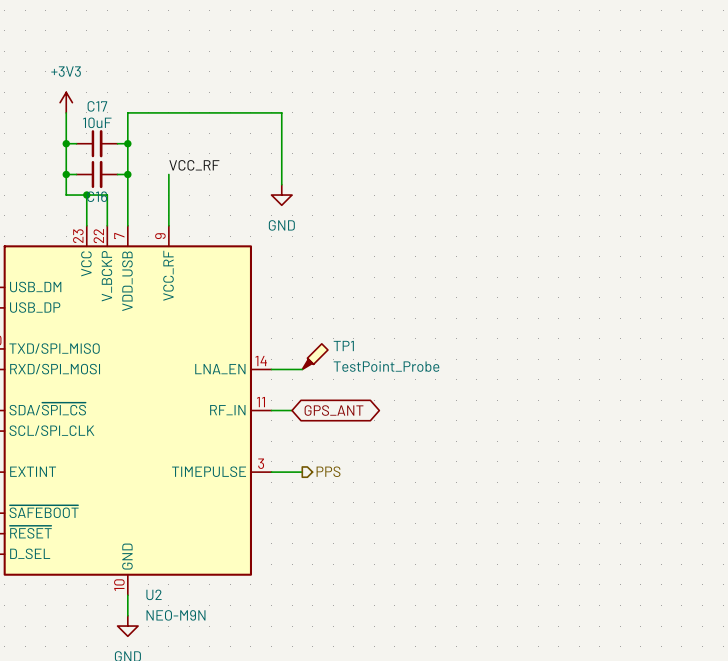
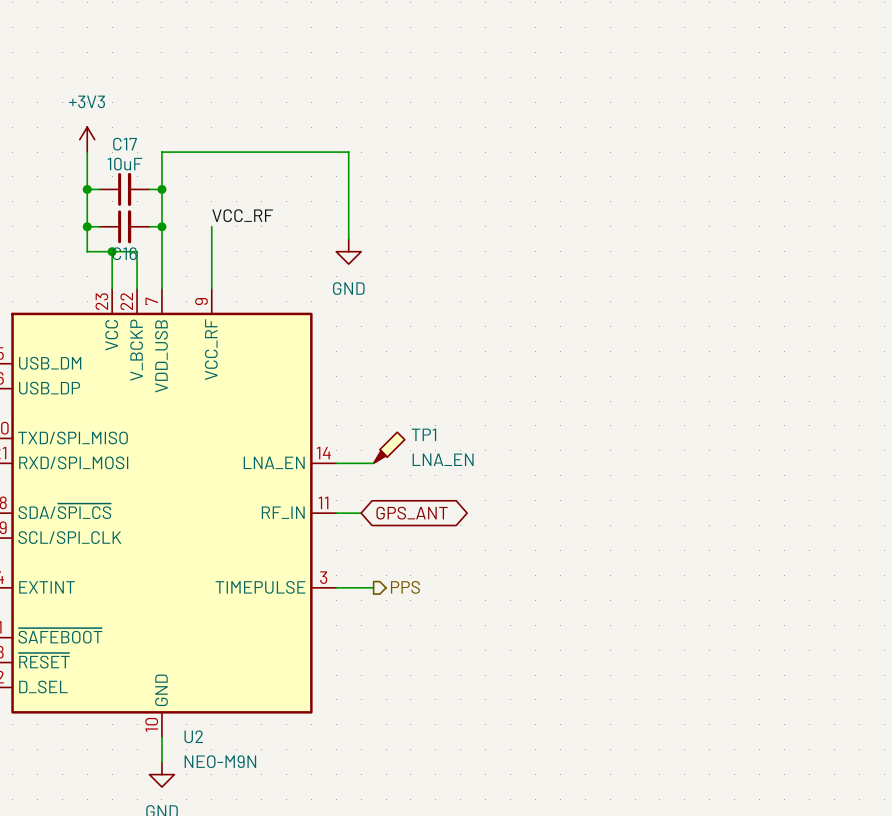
TP1 value: TestPoint_Probe (386, 366) -> LNA_EN (443, 459)

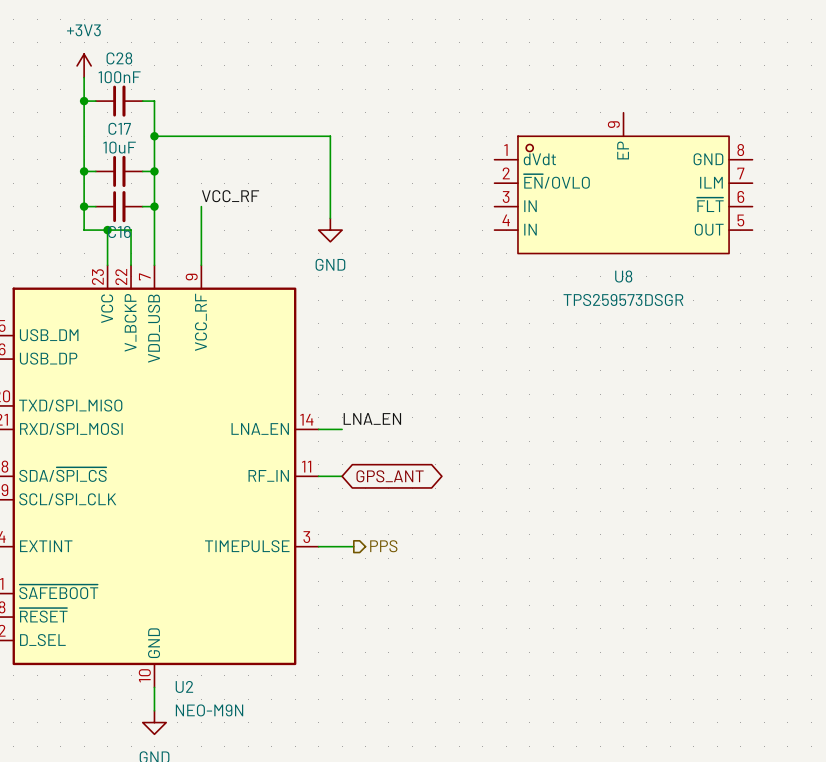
wire: none -> (84, 77) (84, 136)
wire: none -> (84, 101) (95, 101)
junction: none -> (84, 101)
C28: none -> 100nF (119, 101)
wire: none -> (142, 101) (154, 101) (154, 136)
power symbol position: +3V3 (87, 139) -> +3V3 (84, 65)
junction: none -> (154, 136)
U8: none -> TPS259573DSGR (623, 183)
TP1: LNA_EN (389, 447) -> none
label: none -> LNA_EN (372, 418)
wire: (361, 463) (373, 463) -> none

